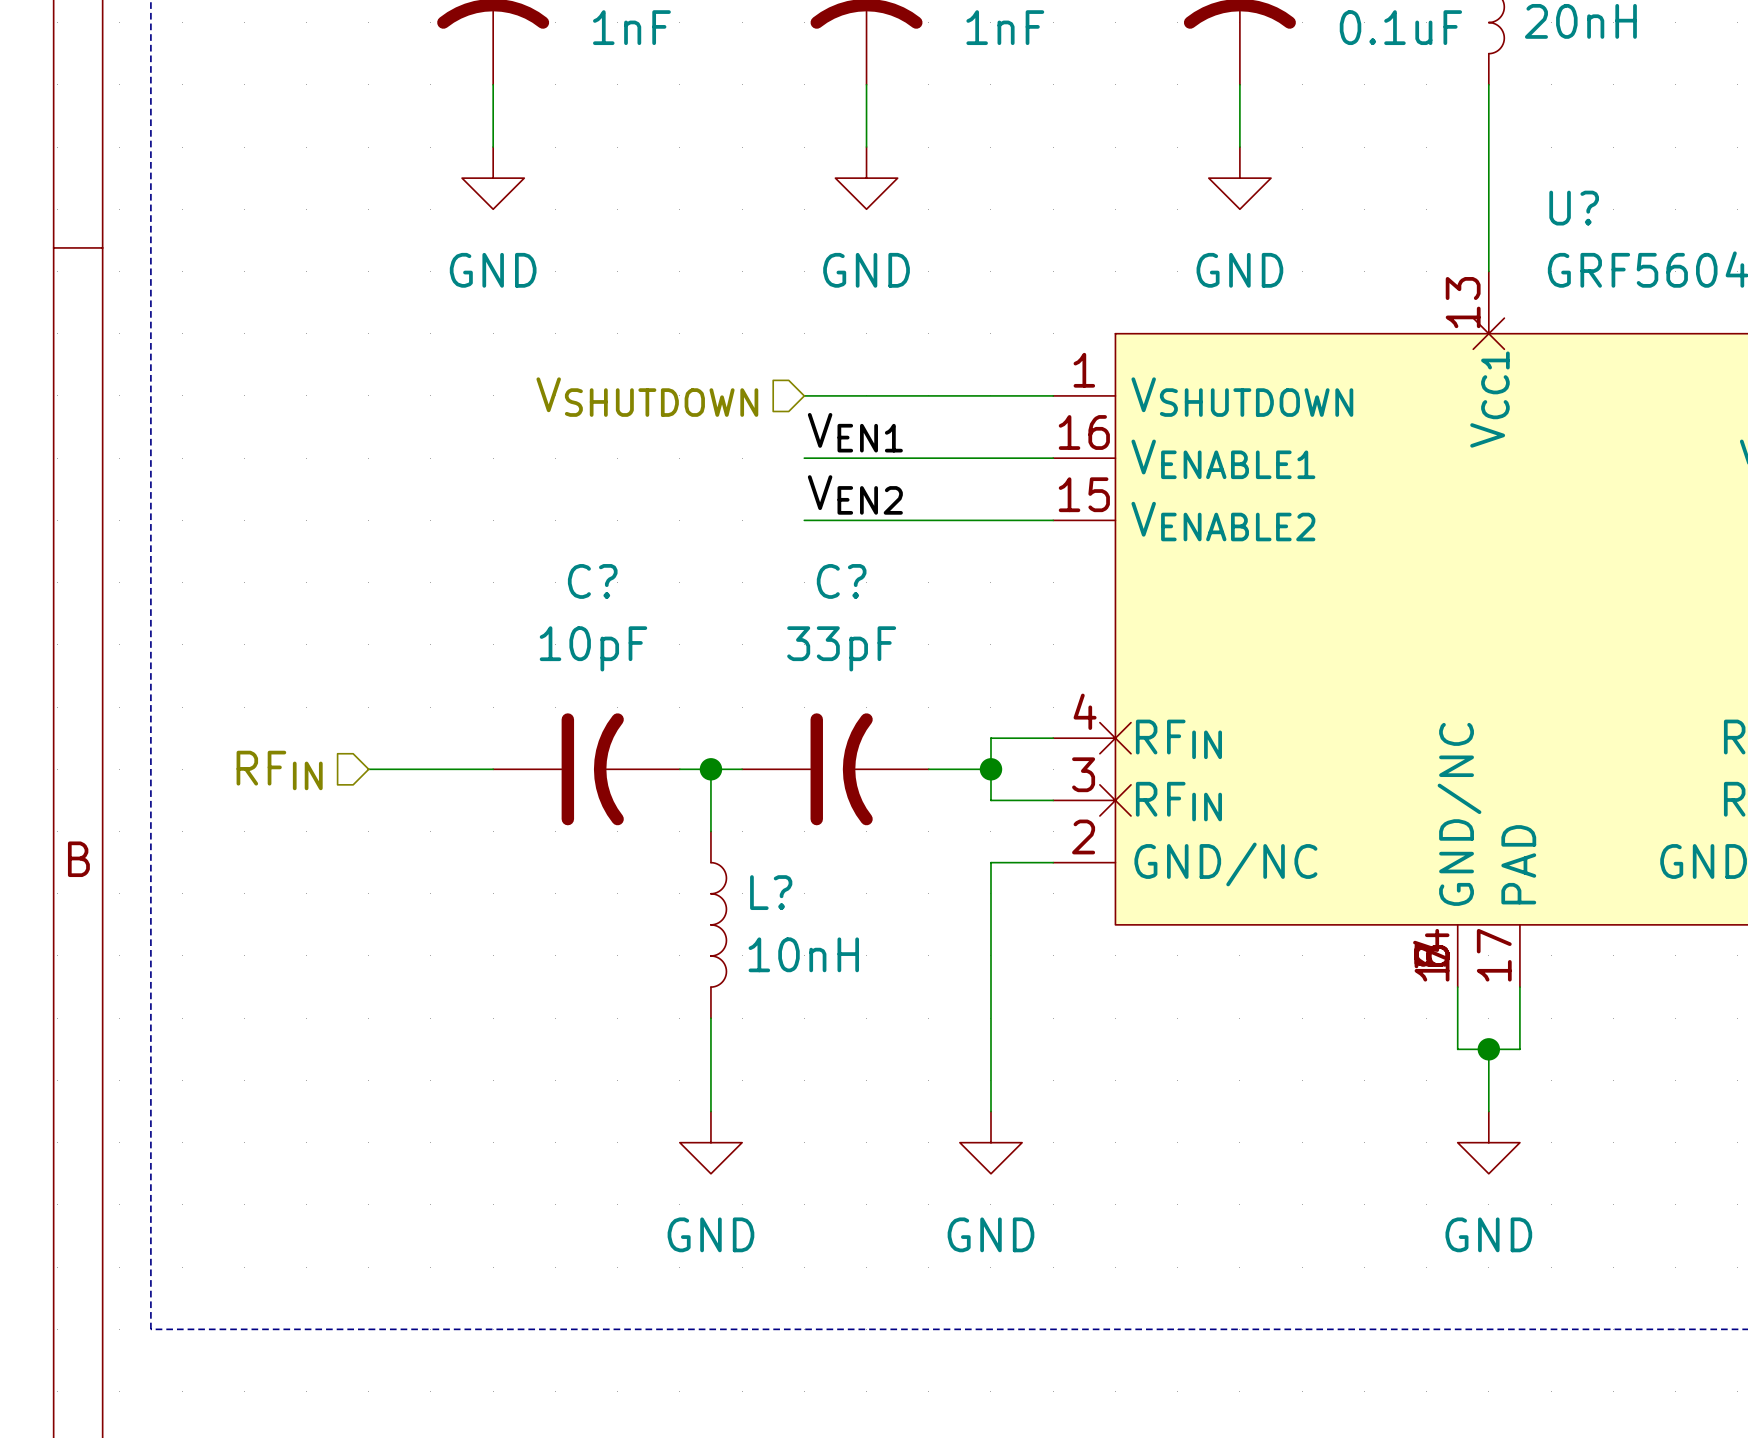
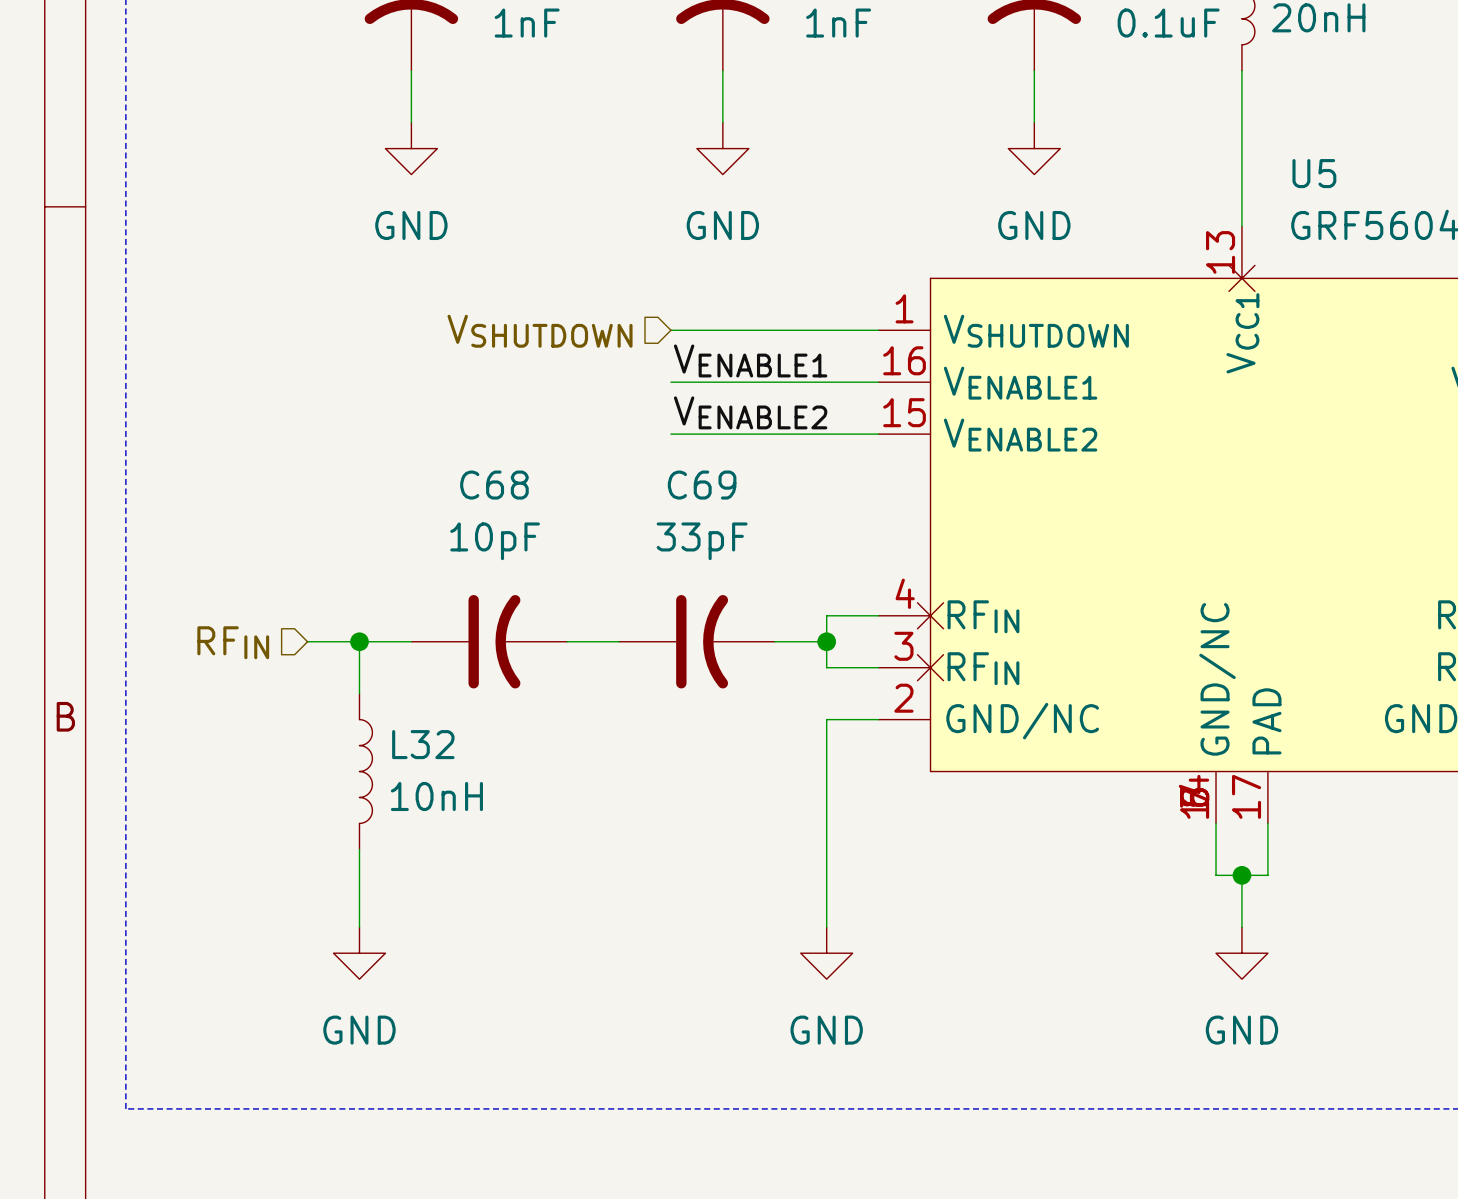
U? name: U? (1574, 208) -> U5 (1314, 173)
label: VEN1 (855, 432) -> VENABLE1 (750, 360)
label: VEN2 (855, 494) -> VENABLE2 (750, 412)
C? name: C? (592, 581) -> C68 (494, 485)
C? name: C? (841, 581) -> C69 (702, 485)
junction: none -> (359, 641)
wire: (710, 769) (710, 831) -> (359, 641) (359, 693)
junction: (710, 769) -> none
L32: none -> 10nH (365, 771)
L?: 10nH (718, 924) -> none
wire: (710, 1018) (710, 1111) -> (359, 849) (359, 927)
power symbol position: GND (710, 1142) -> GND (359, 953)

